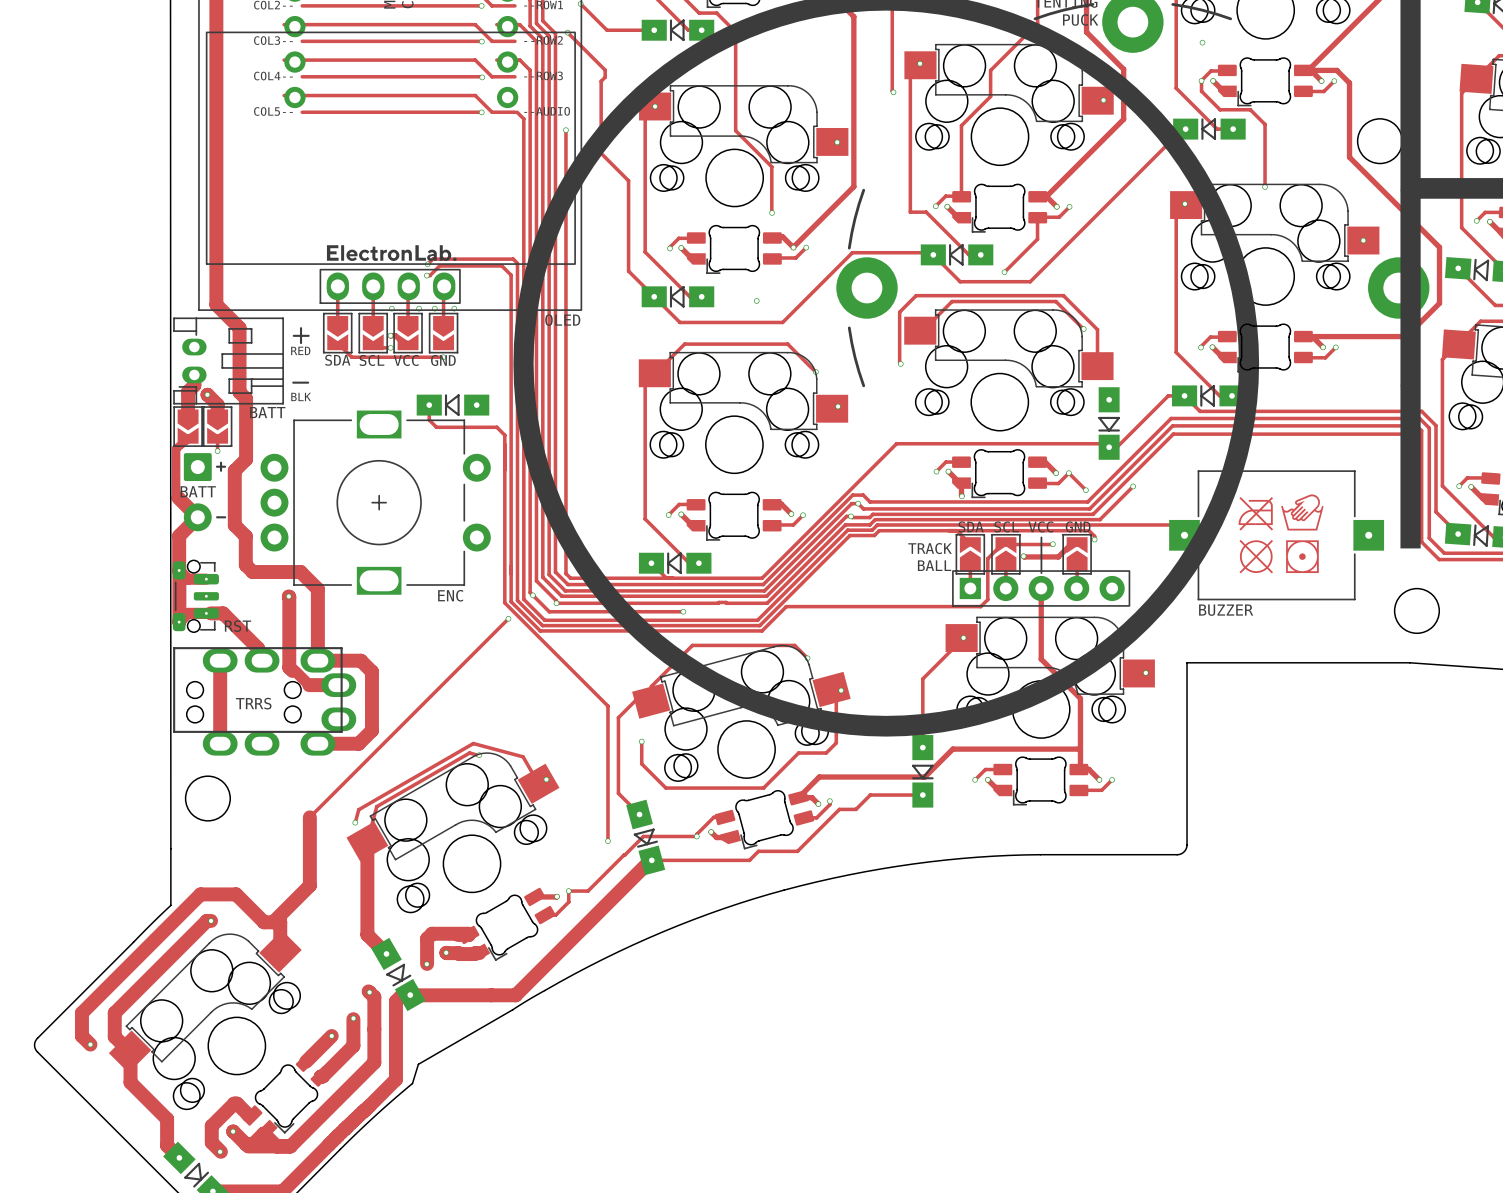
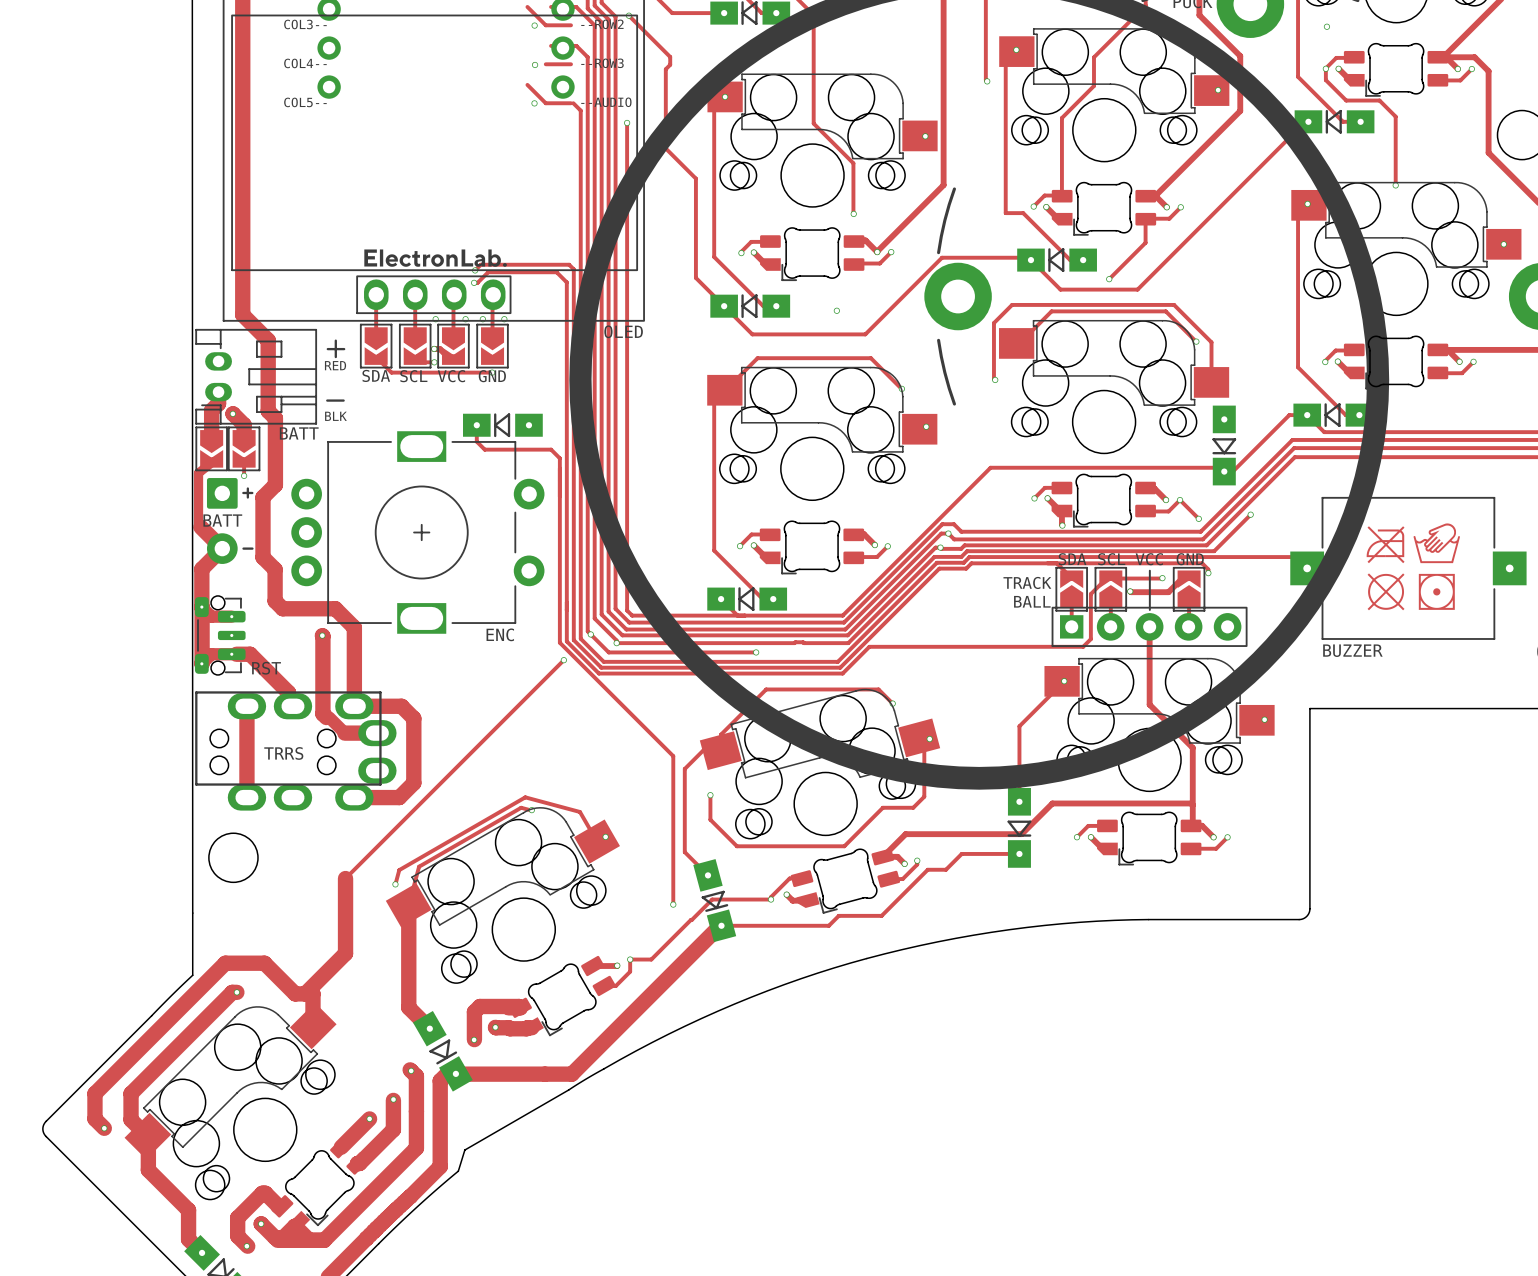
track: (284, 24) (475, 24) -> none
track: (302, 41) (481, 41) -> none
track: (284, 60) (475, 60) (492, 76) -> none
track: (302, 76) (481, 76) -> none
track: (284, 95) (475, 95) -> none
track: (302, 112) (481, 112) -> none

